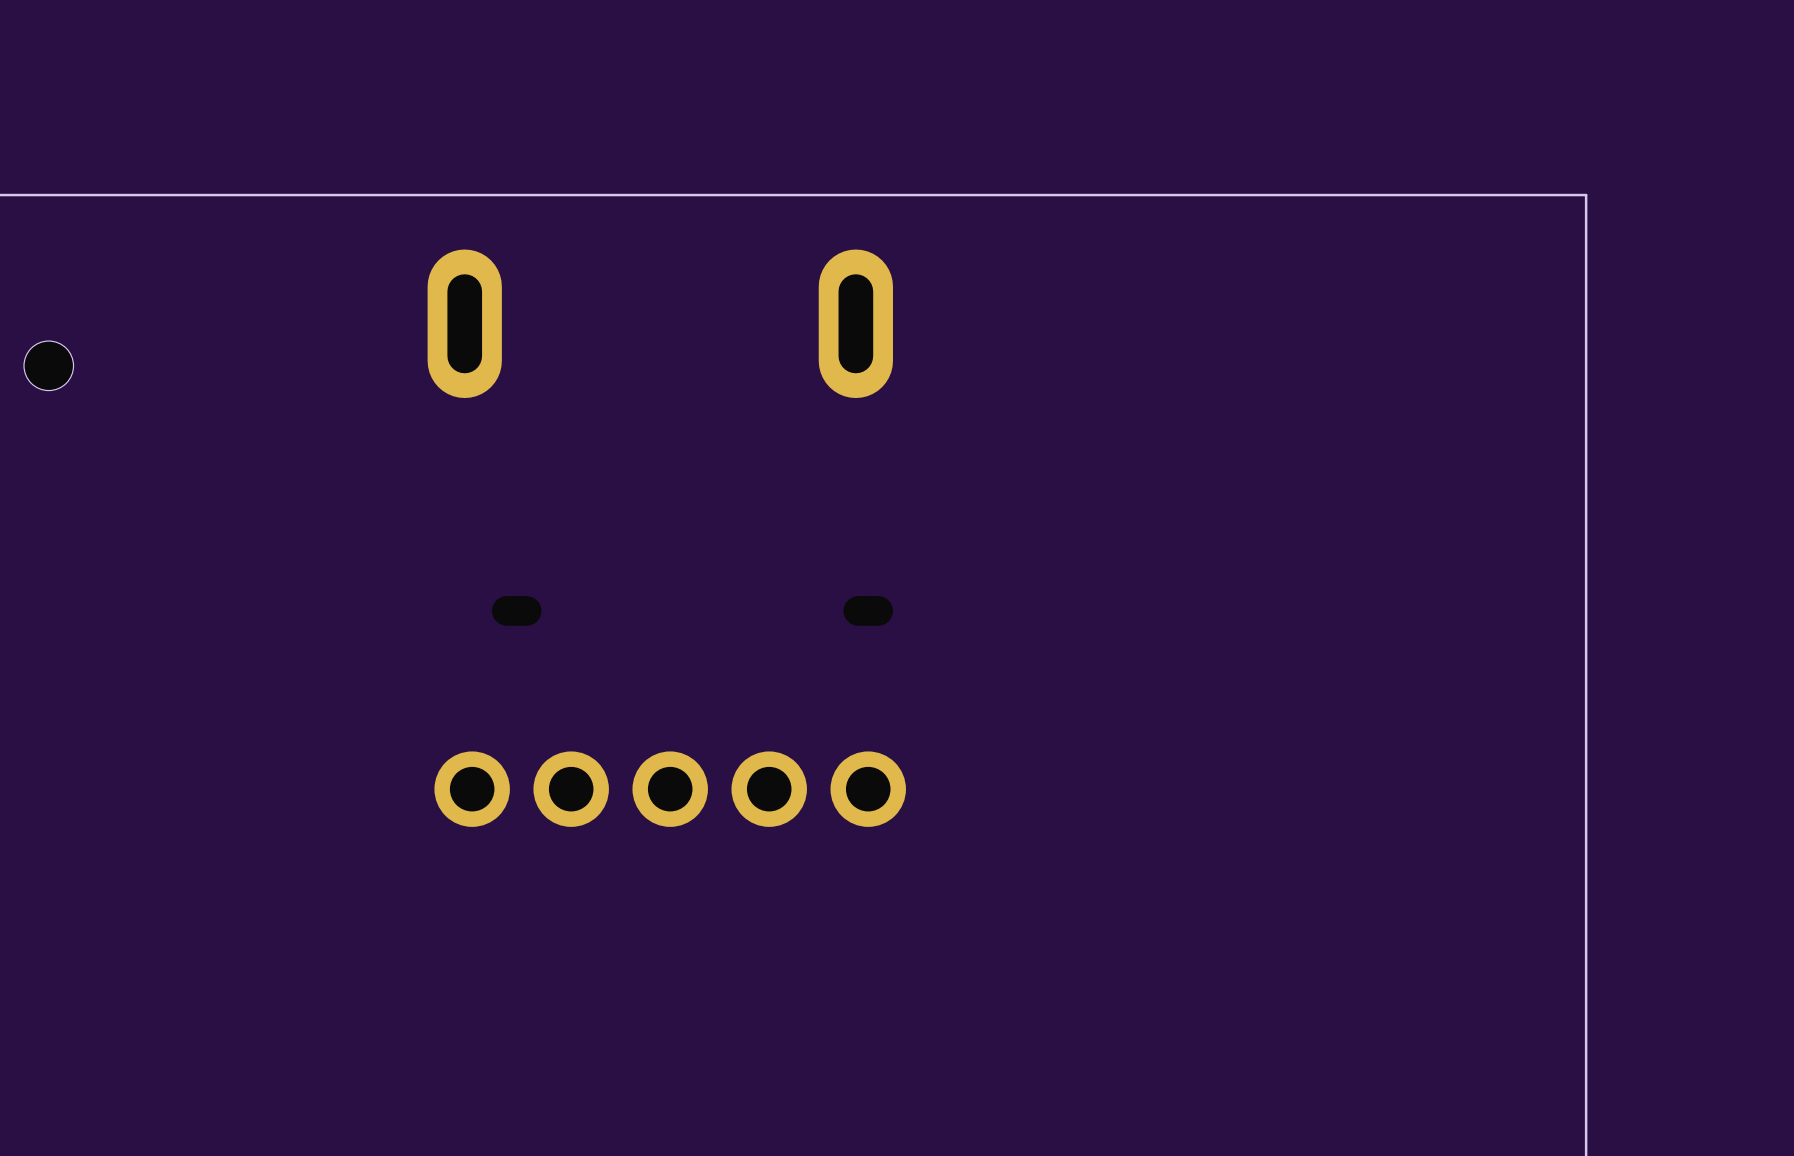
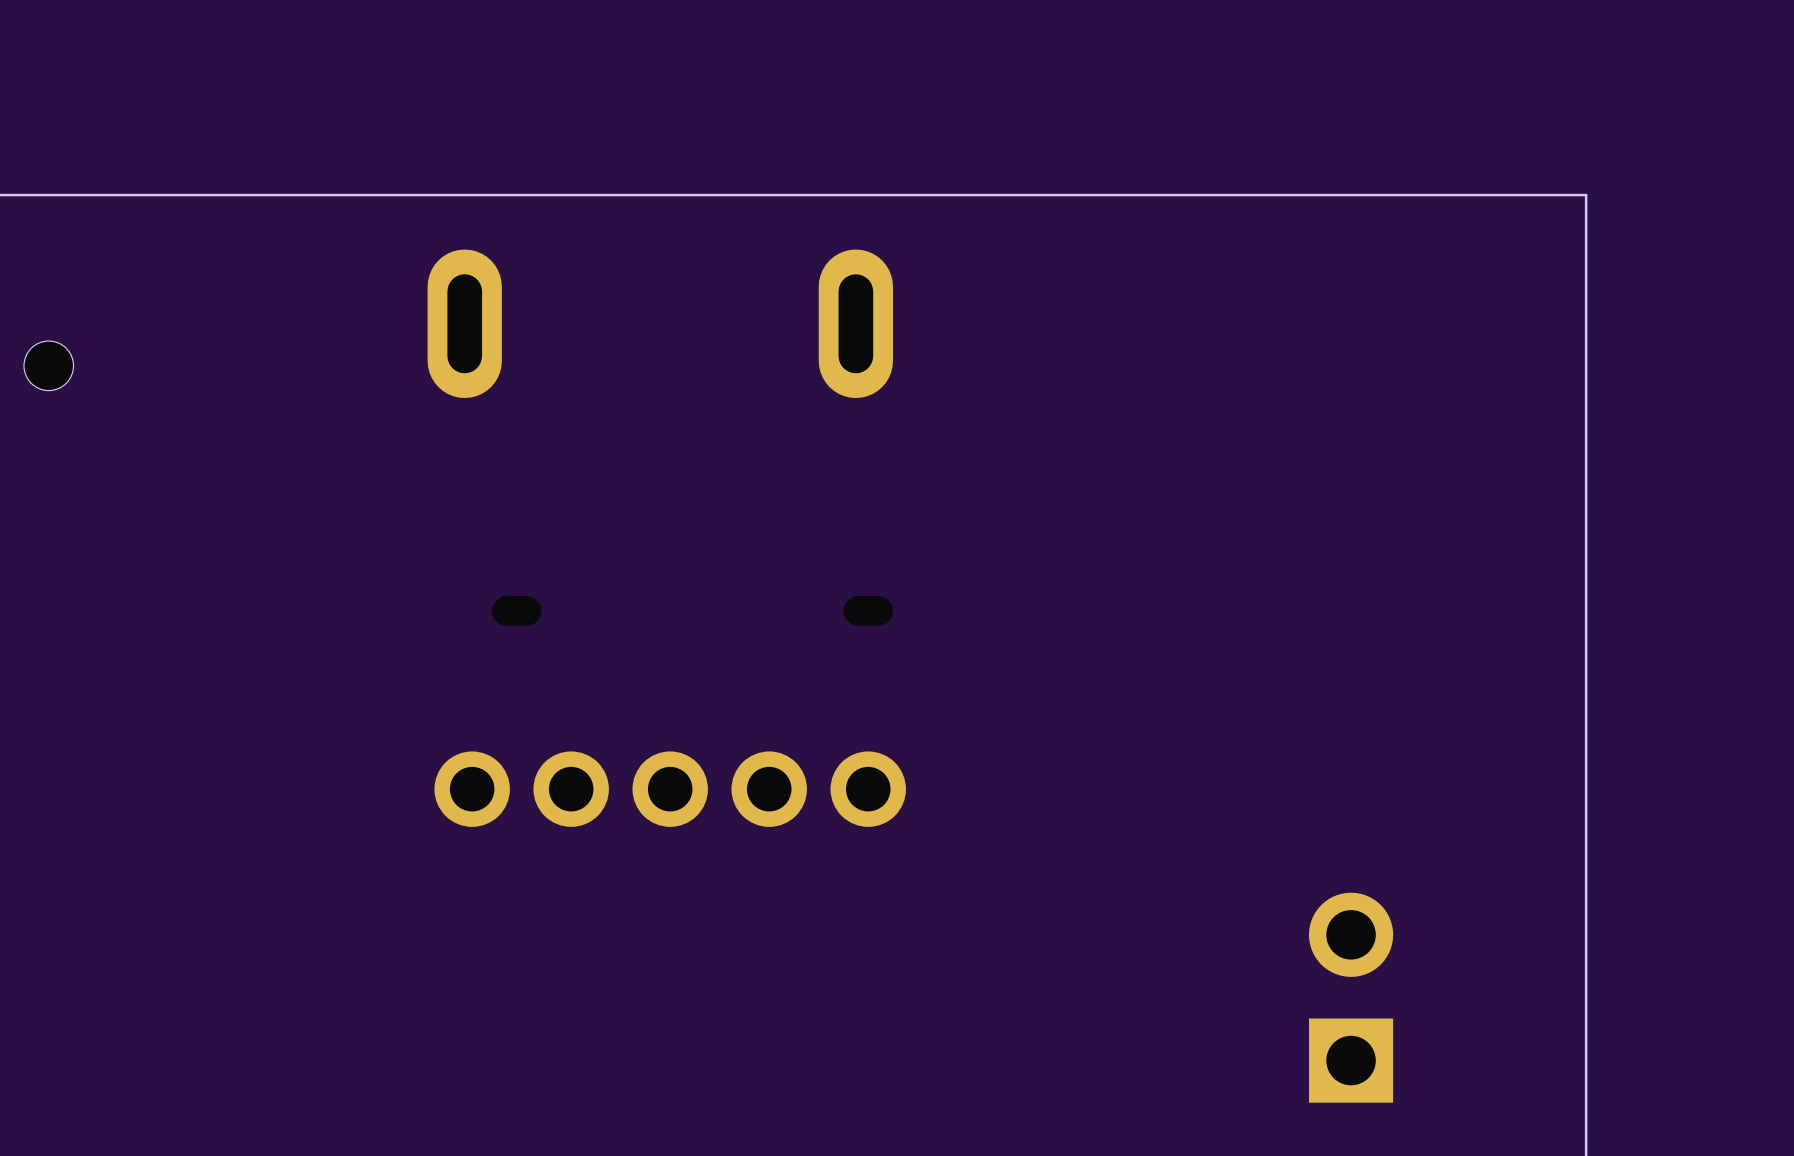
part: none -> (1351, 997)

